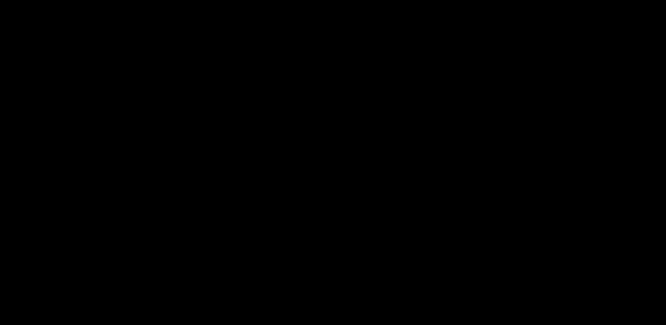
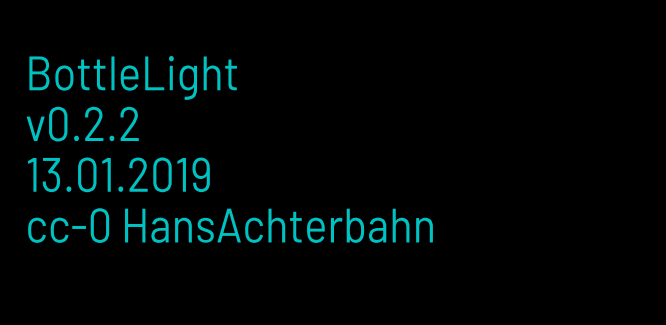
text: none -> BottleLight (133, 77)
text: none -> v0.2.2 (82, 124)
text: none -> 13.01.2019 (118, 174)
text: none -> cc-0 HansAchterbahn (230, 225)

